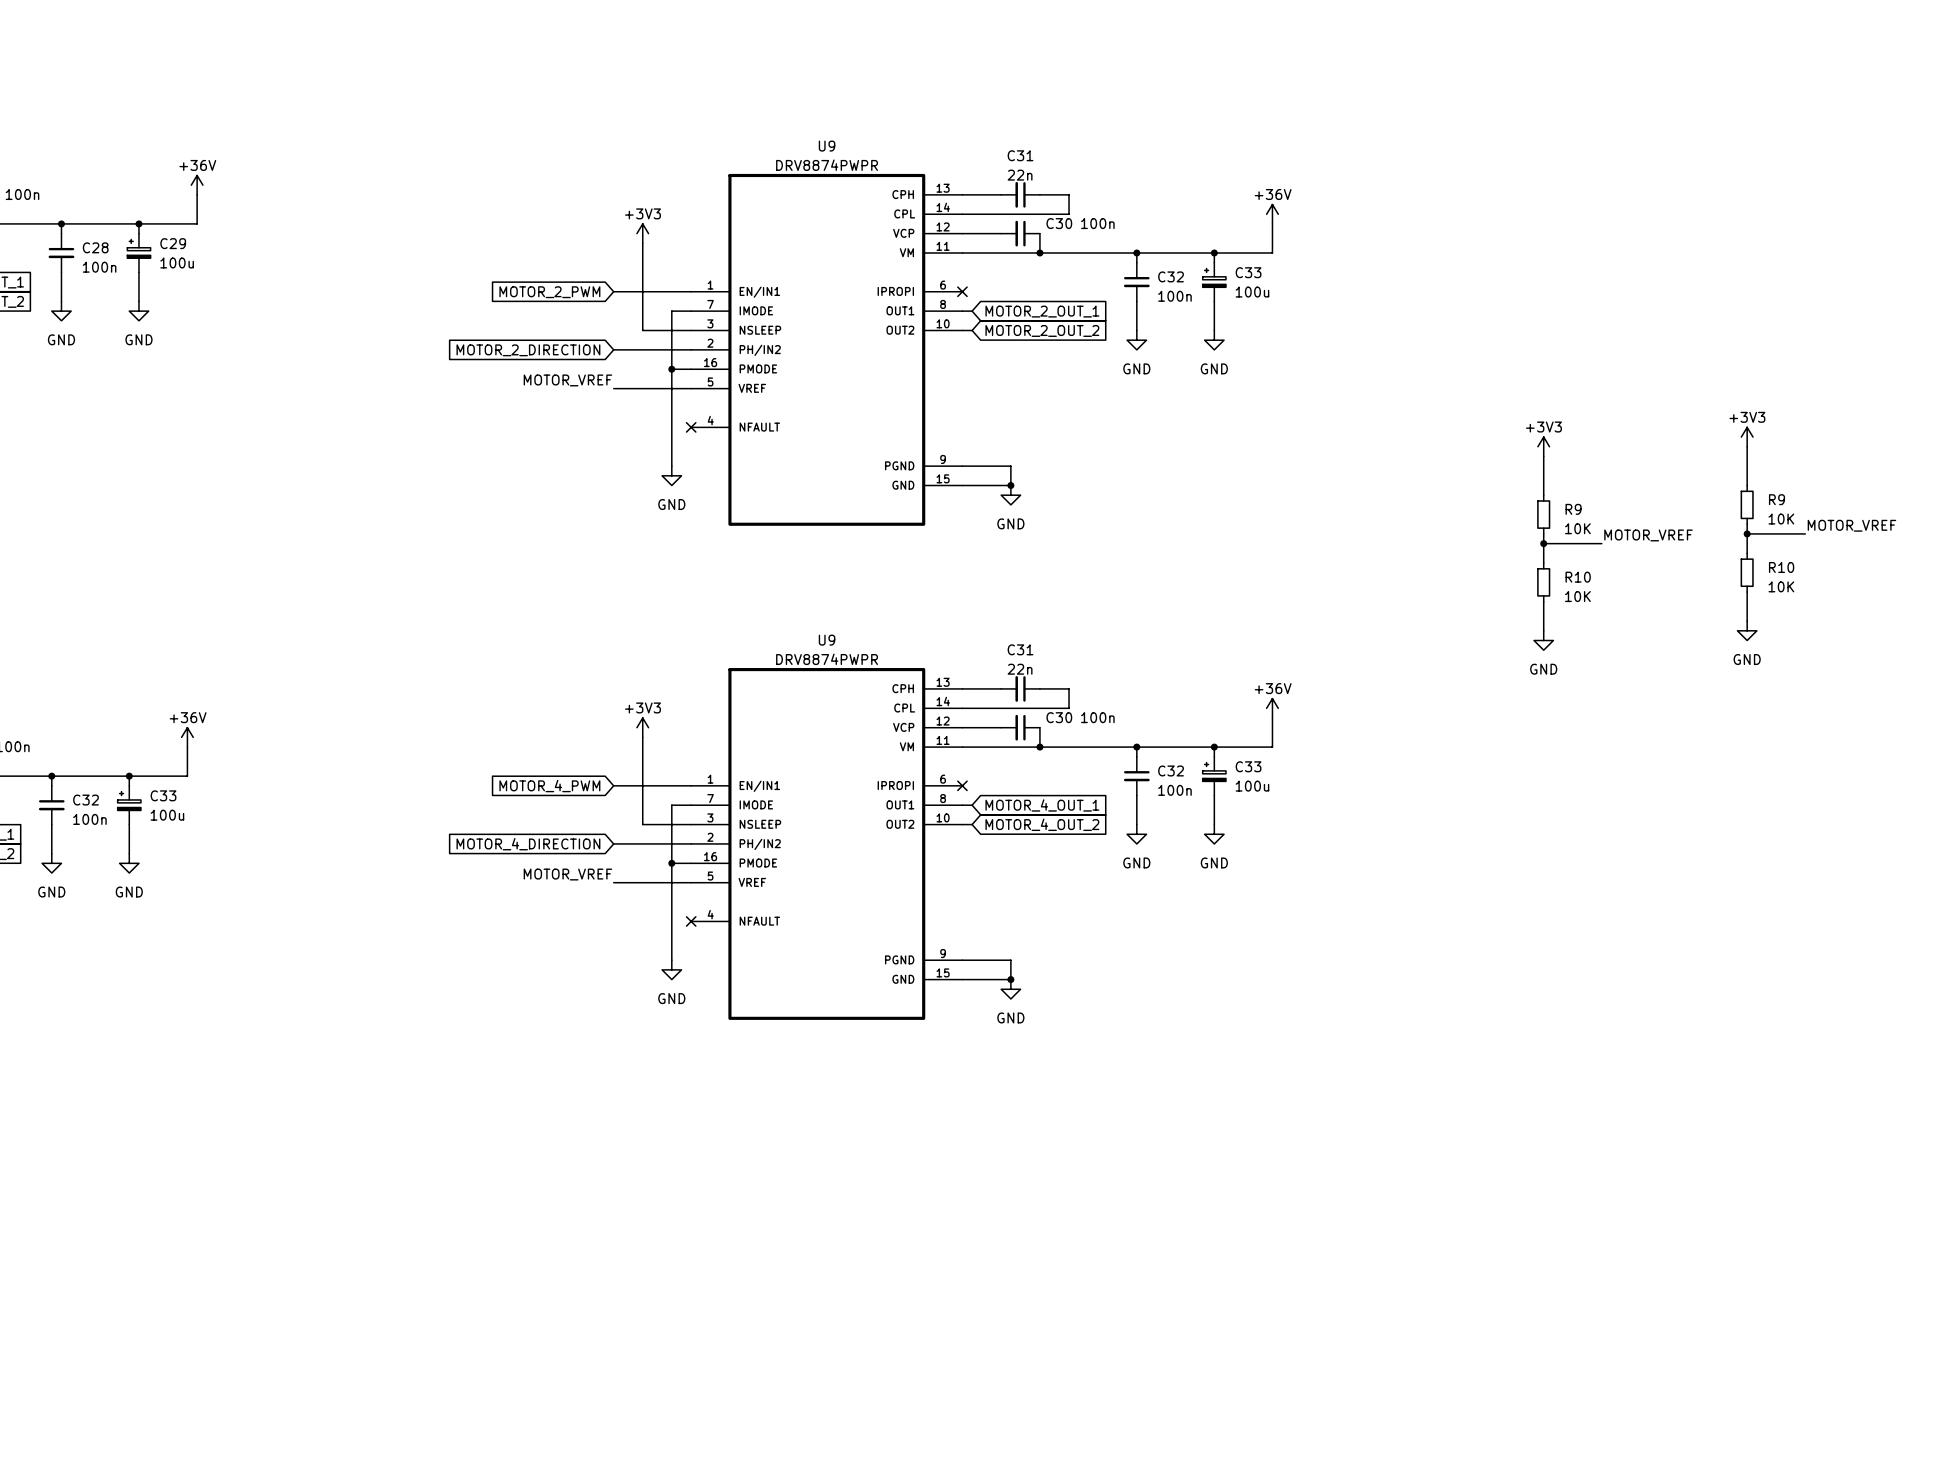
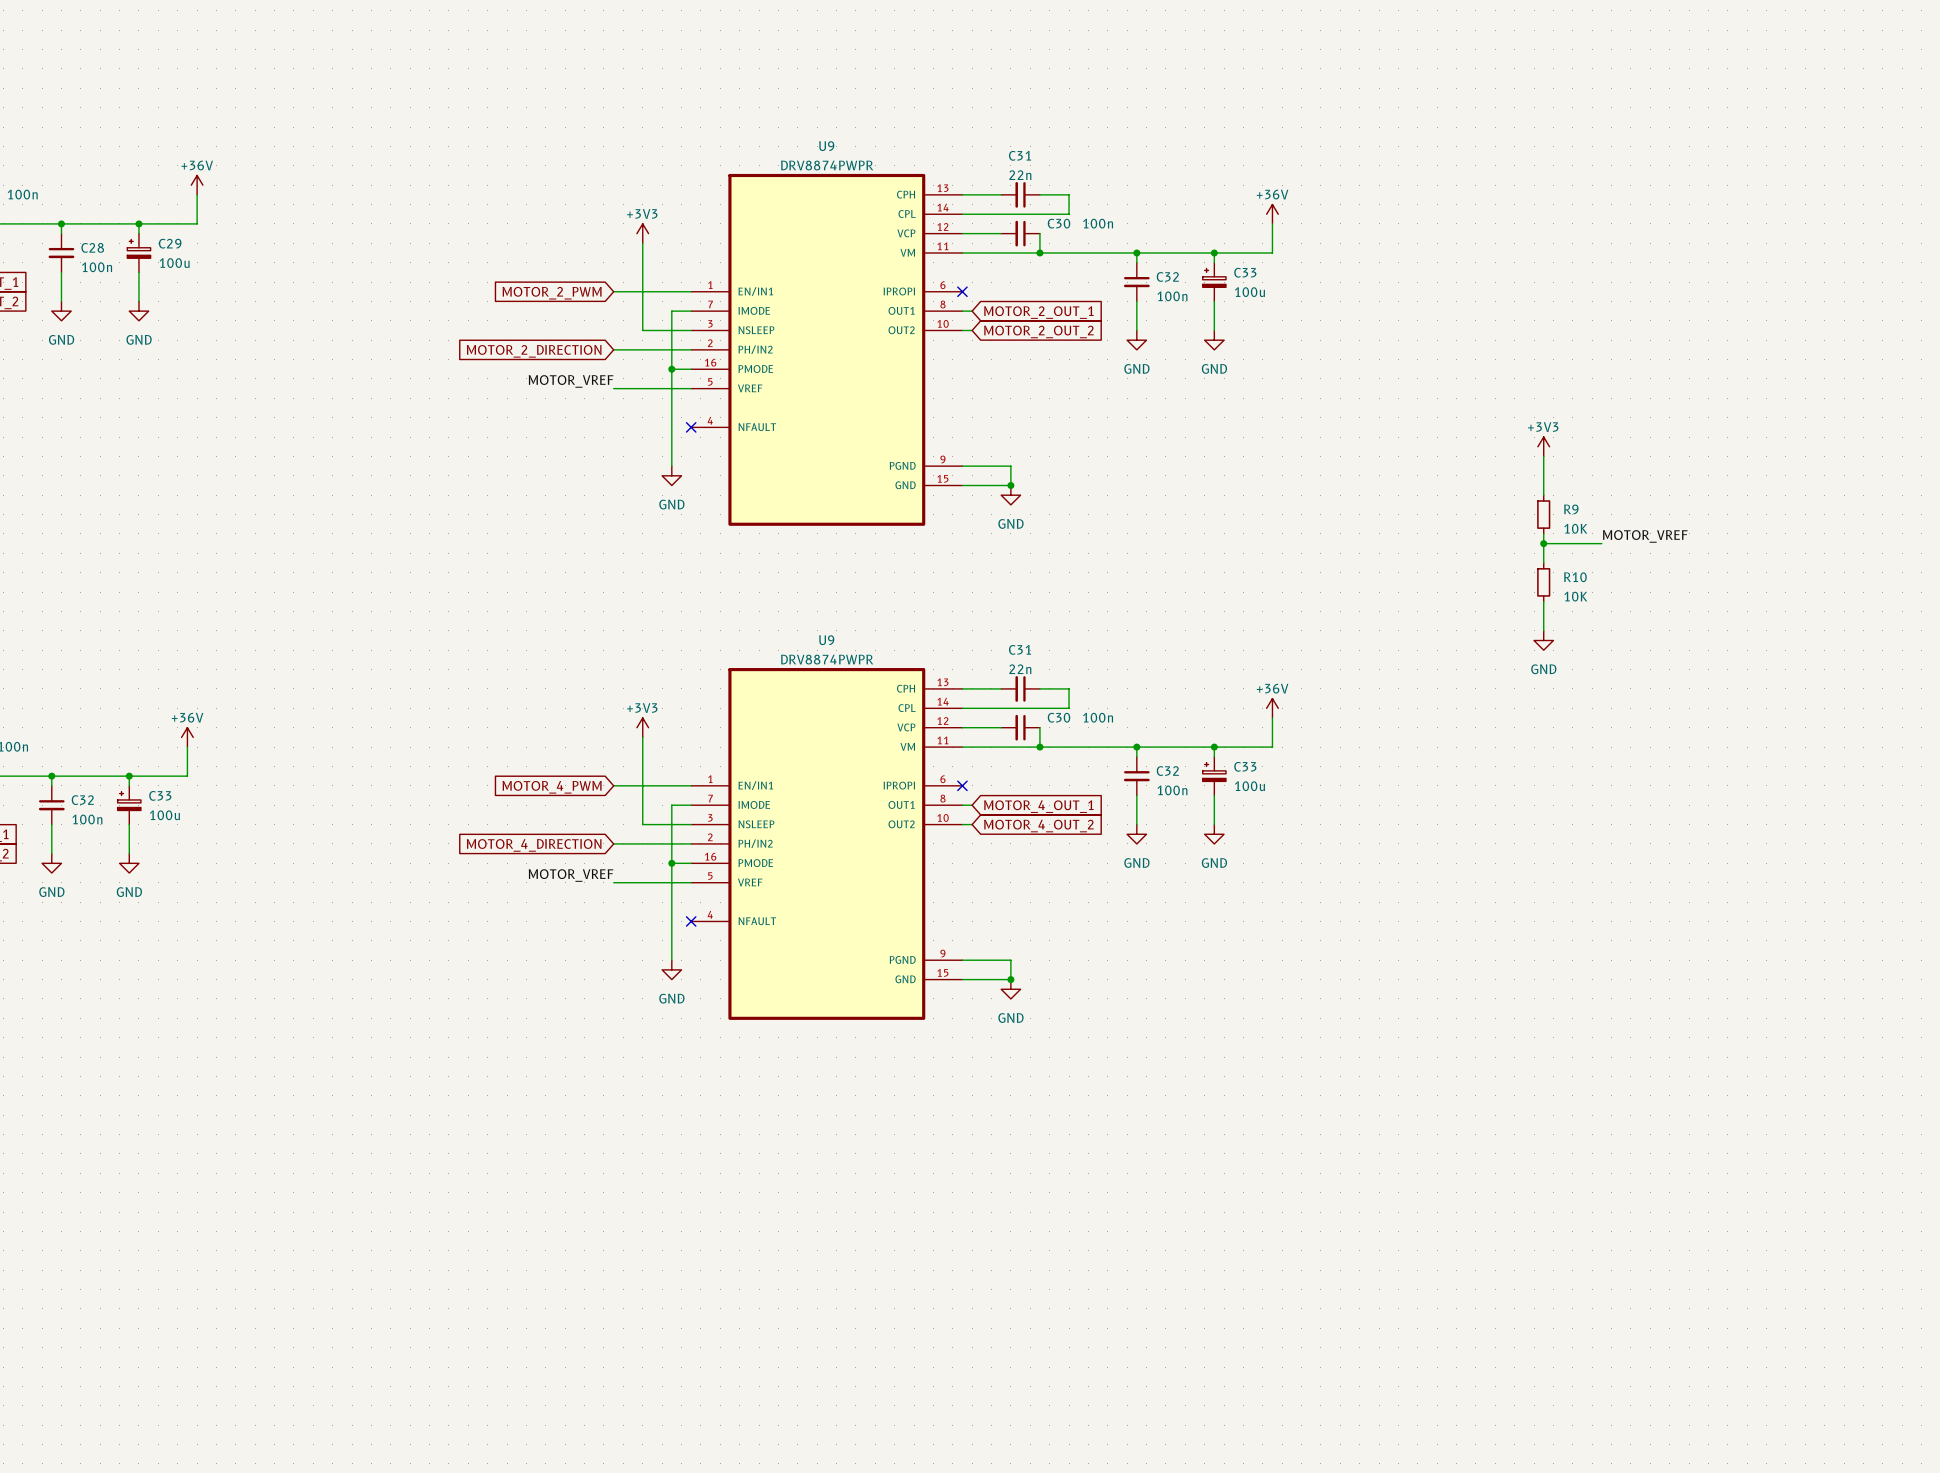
power symbol: +3V3 (1747, 437) -> none
wire: (1747, 446) (1747, 485) -> none
R9: 10K (1747, 504) -> none
wire: (1747, 524) (1747, 553) -> none
label: MOTOR_VREF (1851, 525) -> none
wire: (1747, 533) (1805, 533) -> none
junction: (1747, 533) -> none
R10: 10K (1747, 572) -> none
wire: (1747, 592) (1747, 621) -> none
power symbol: GND (1747, 630) -> none

